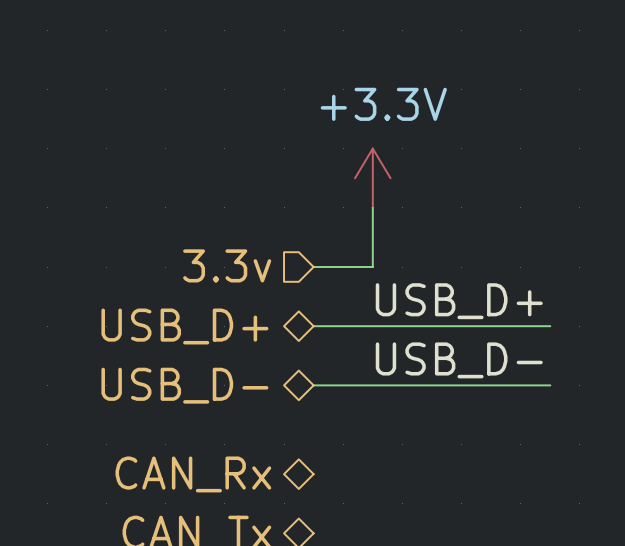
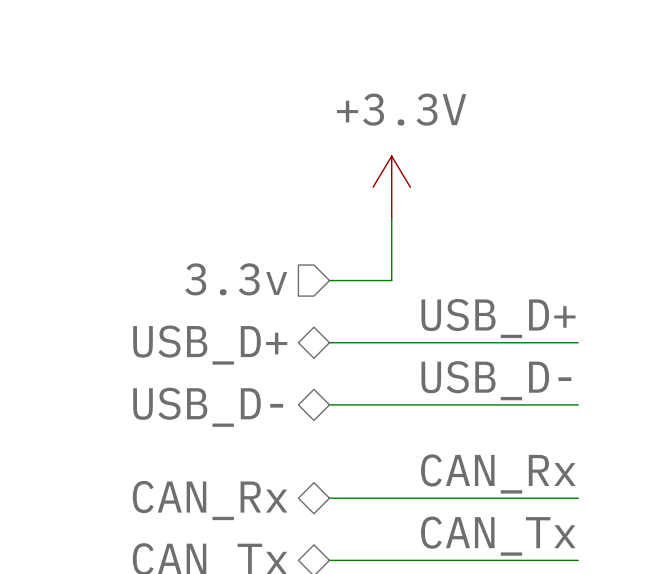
label: none -> CAN_Rx (498, 473)
wire: none -> (329, 498) (578, 498)
label: none -> CAN_Tx (498, 536)
wire: none -> (329, 560) (578, 560)

